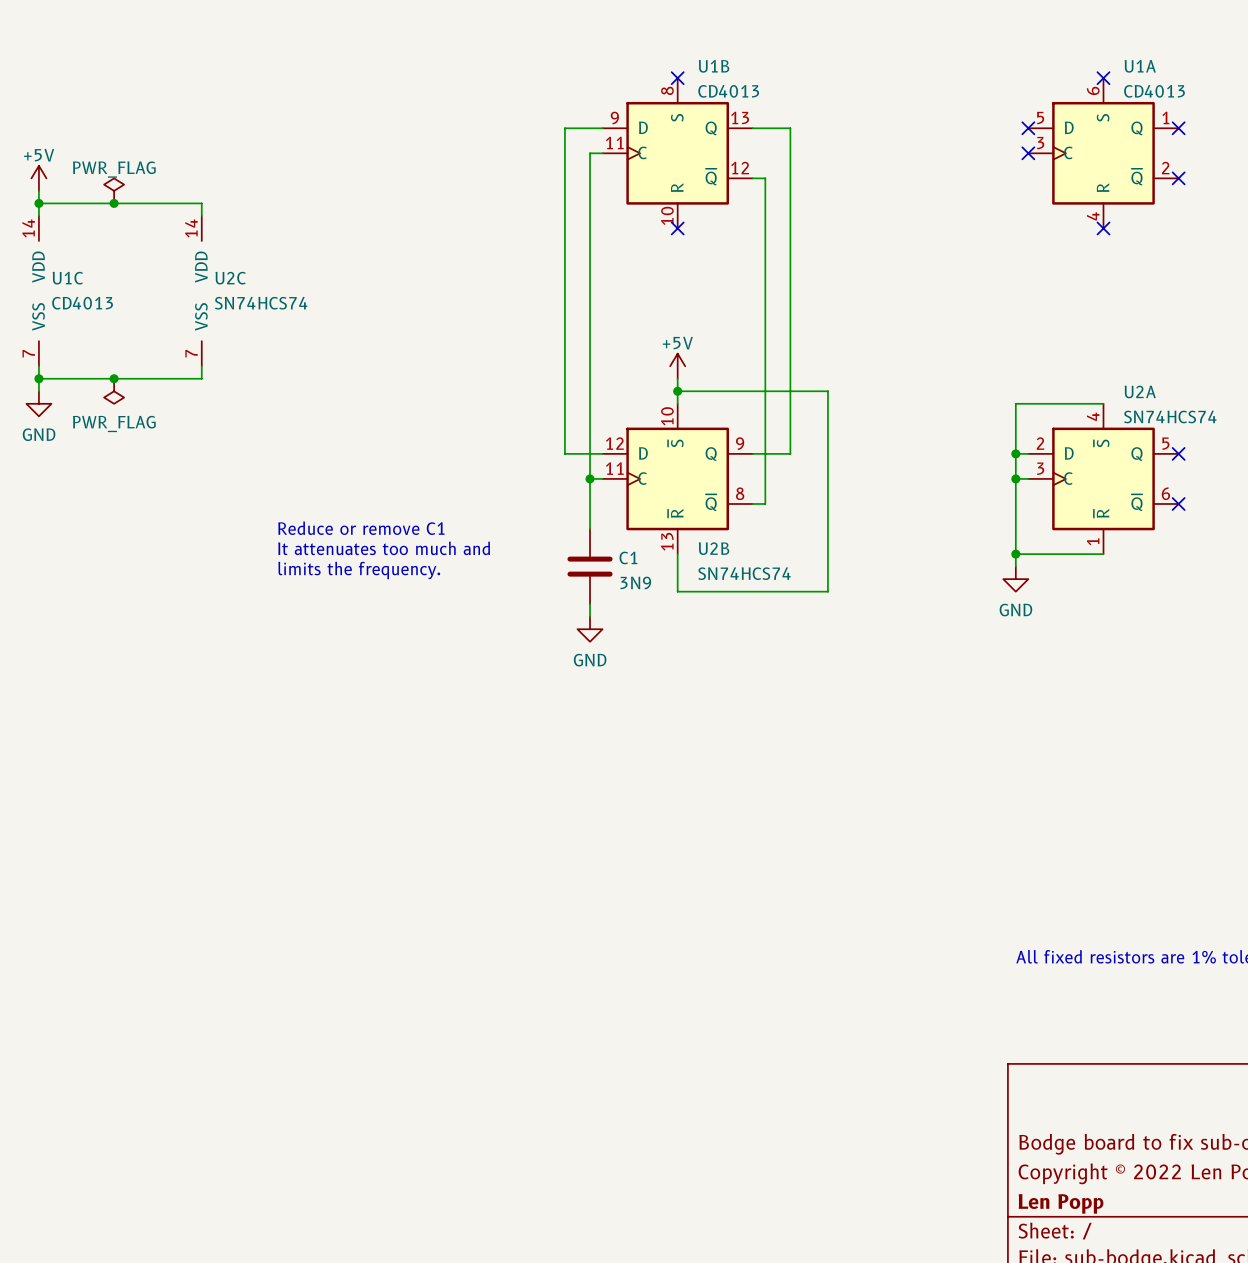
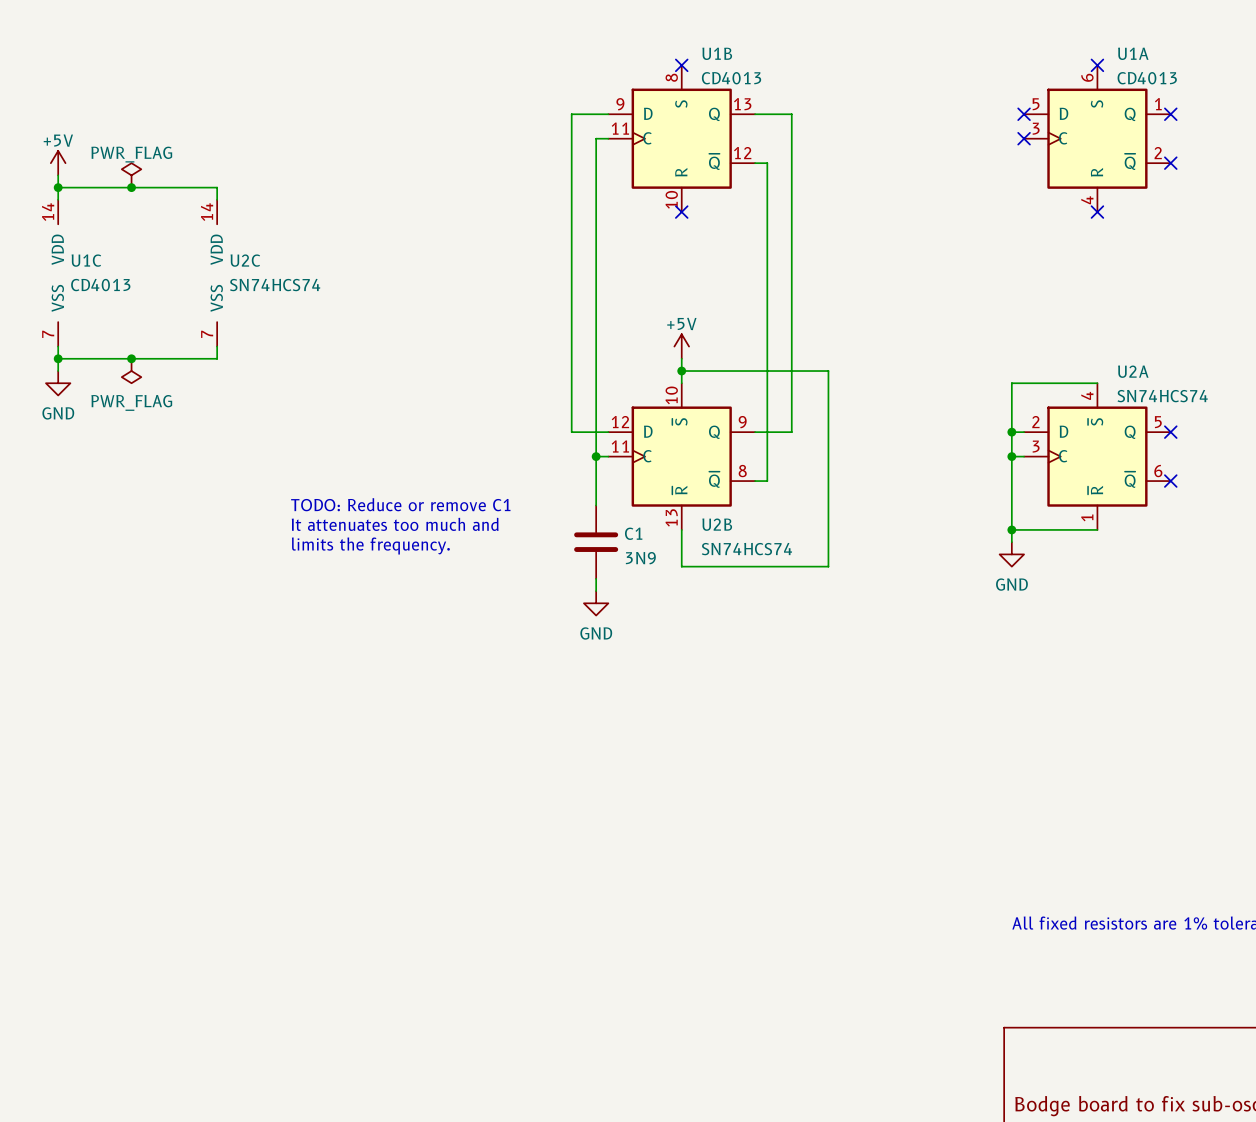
text: Reduce or remove C1 (361, 528) -> TODO: Reduce or remove C1 (400, 504)

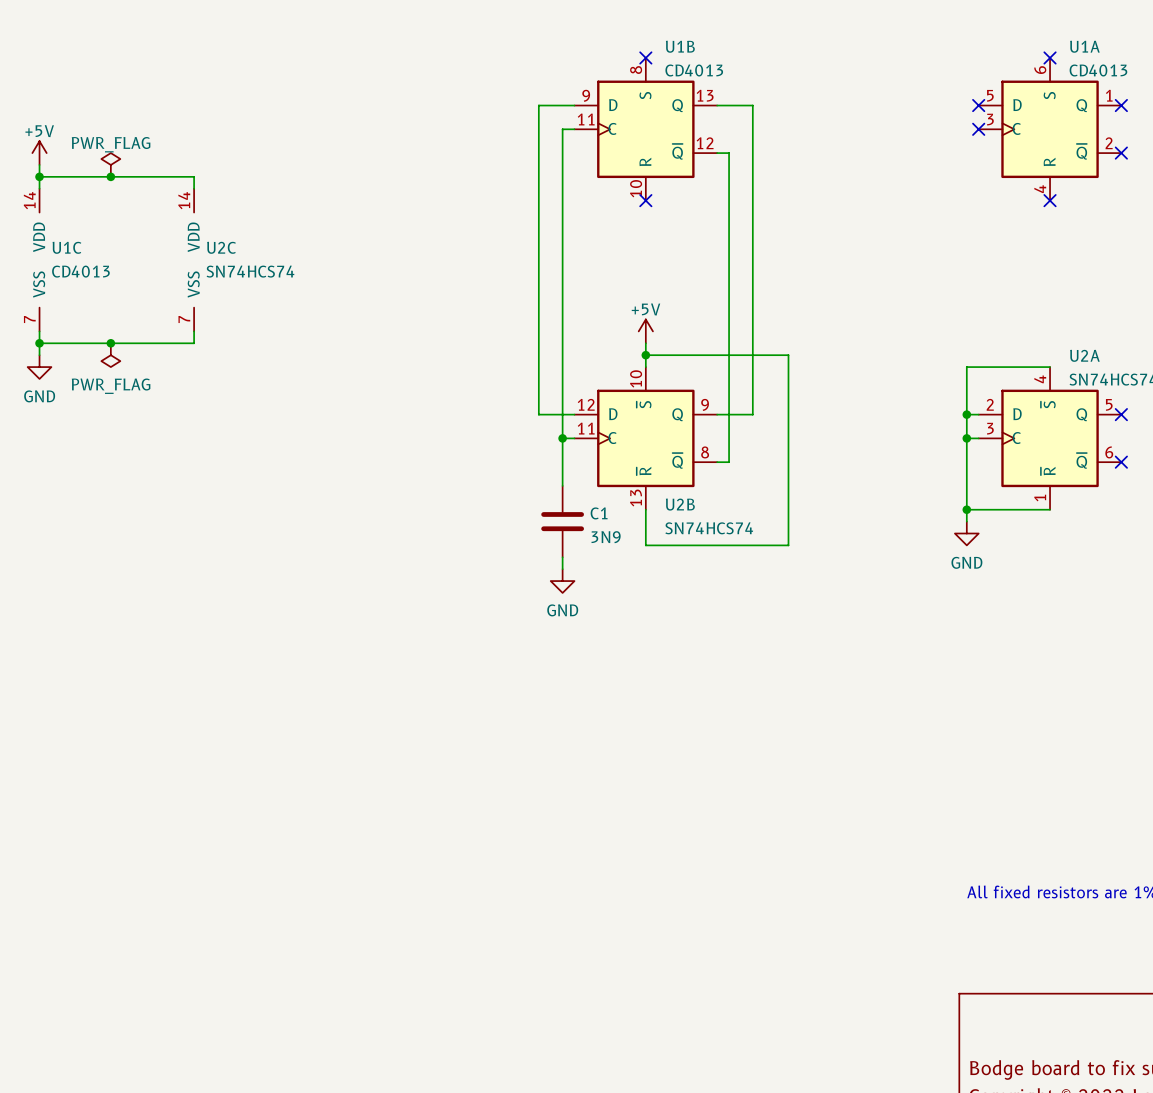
text: TODO: Reduce or remove C1 (400, 504) -> none
text: It attenuates too much and (395, 524) -> none
text: limits the frequency. (370, 546) -> none

